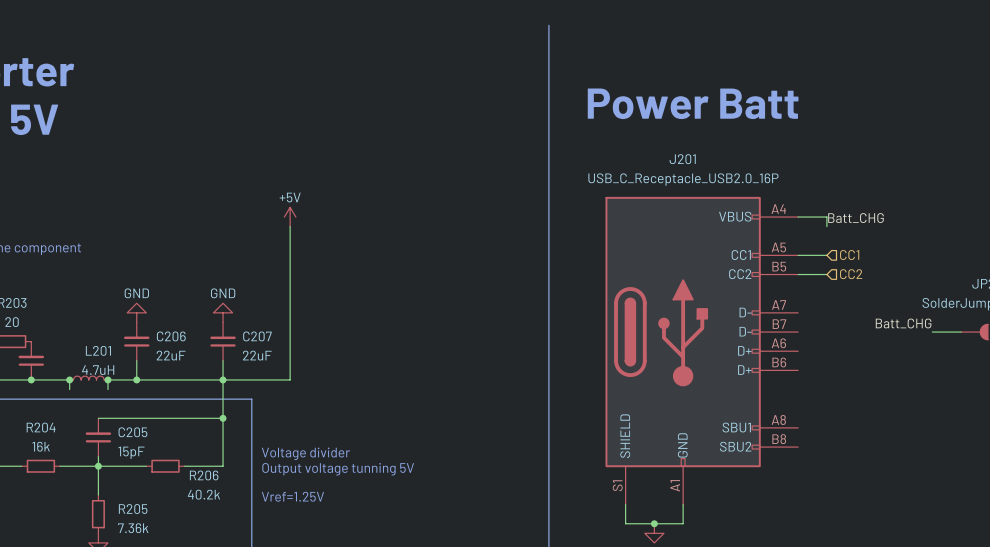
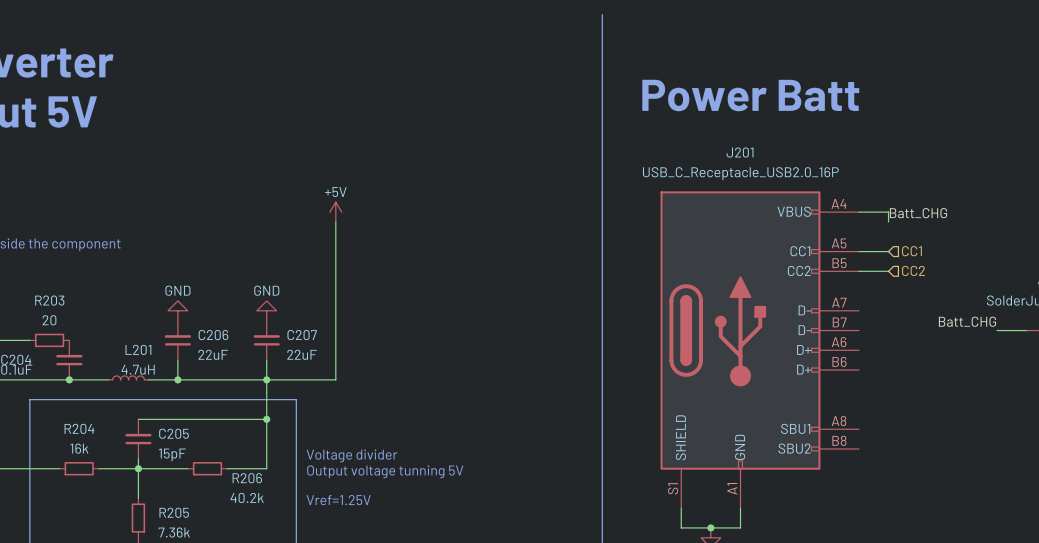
wire: (69, 379) (69, 389) -> none
junction: (69, 379) -> none
wire: (108, 379) (108, 389) -> none
junction: (108, 379) -> none

